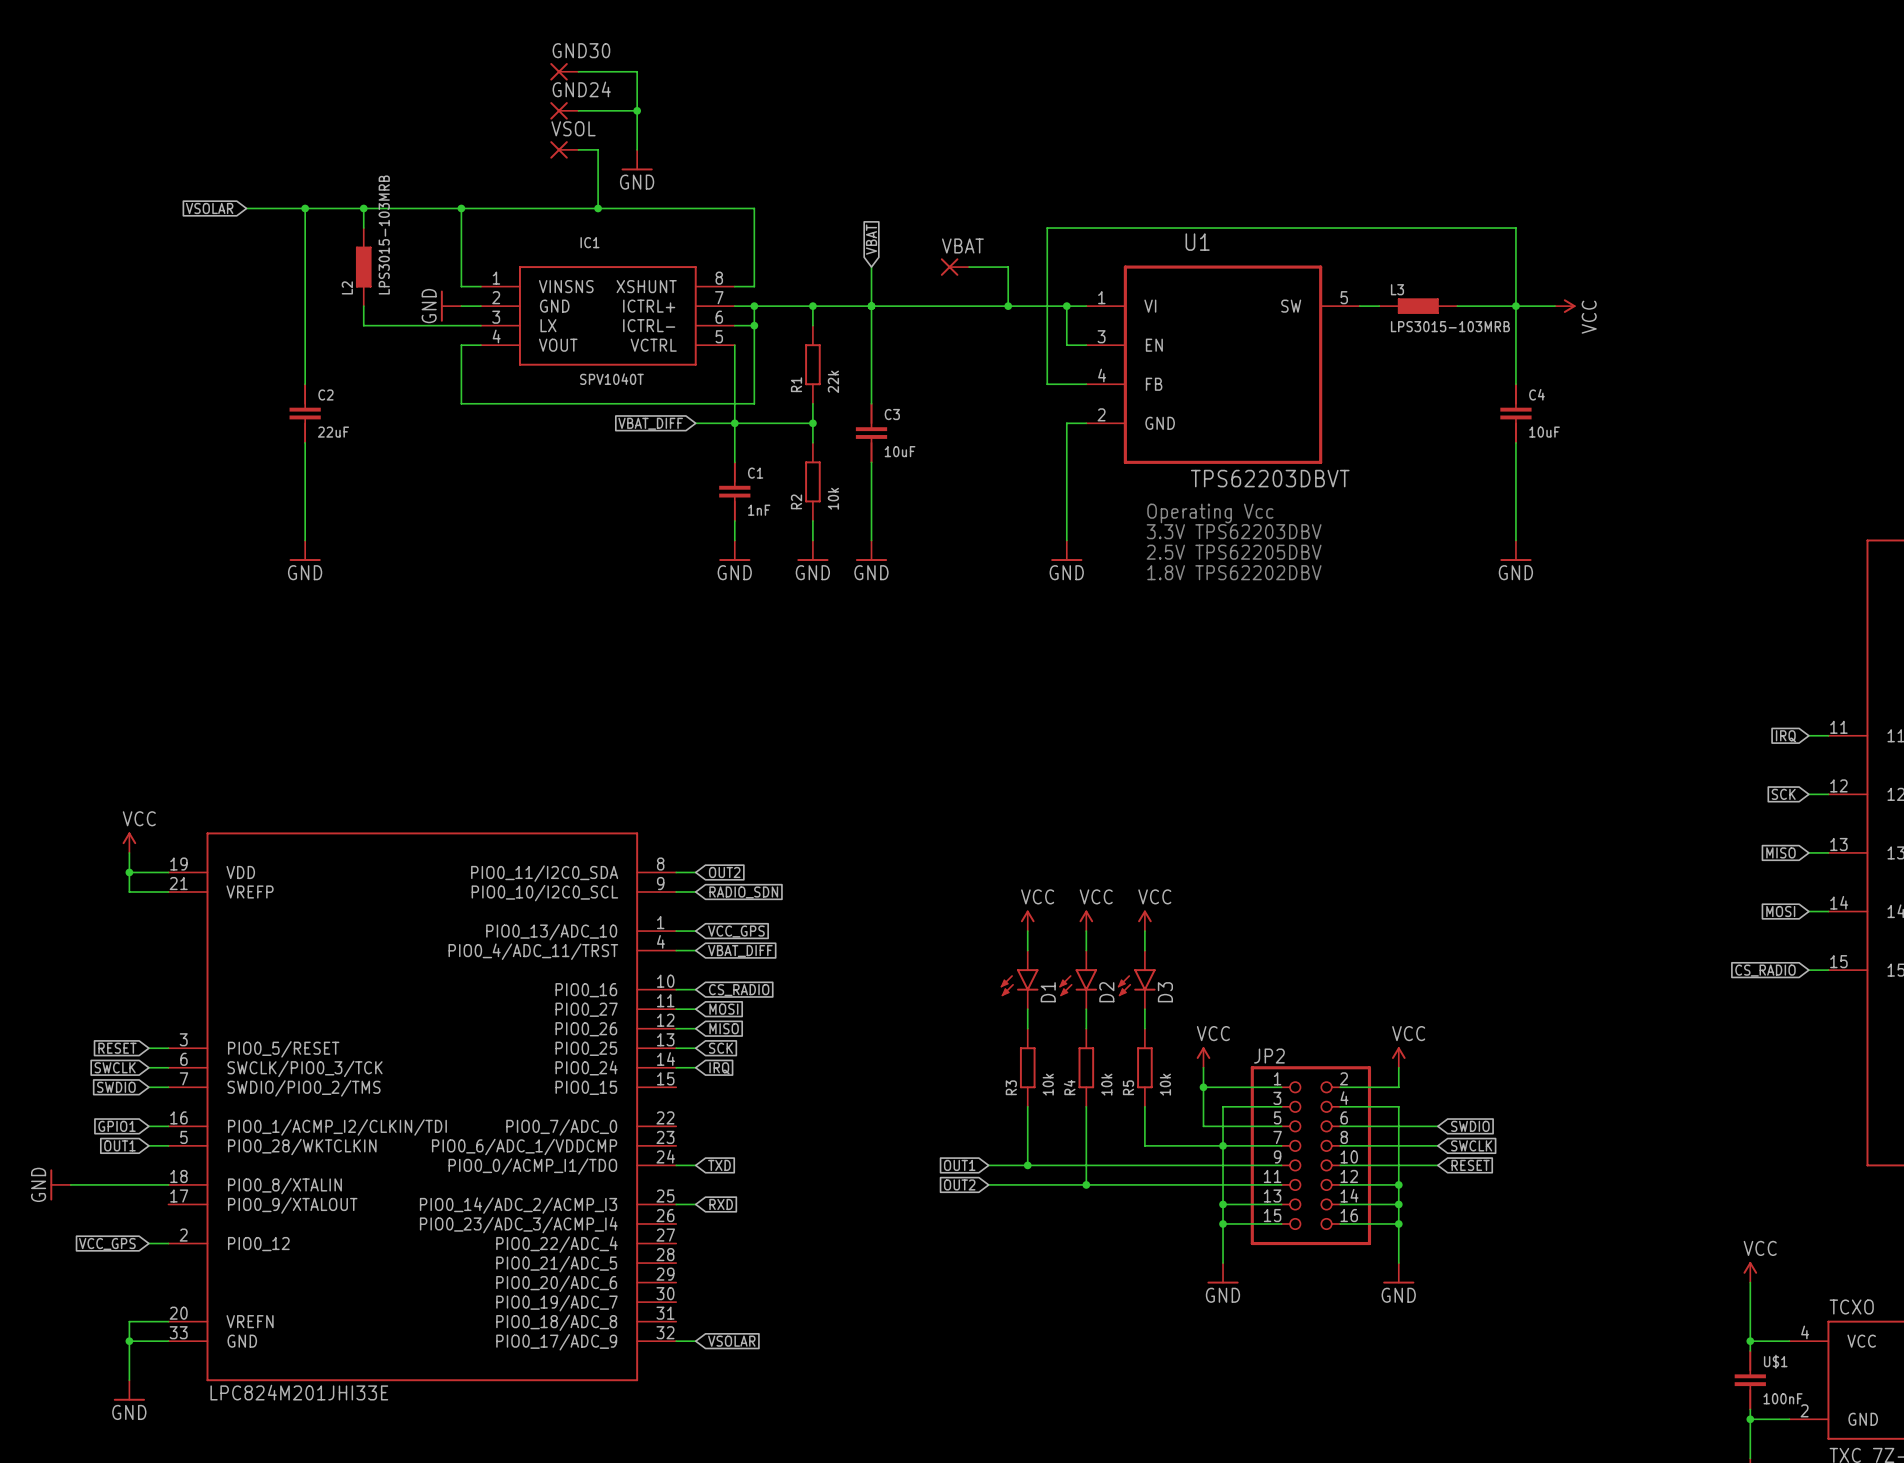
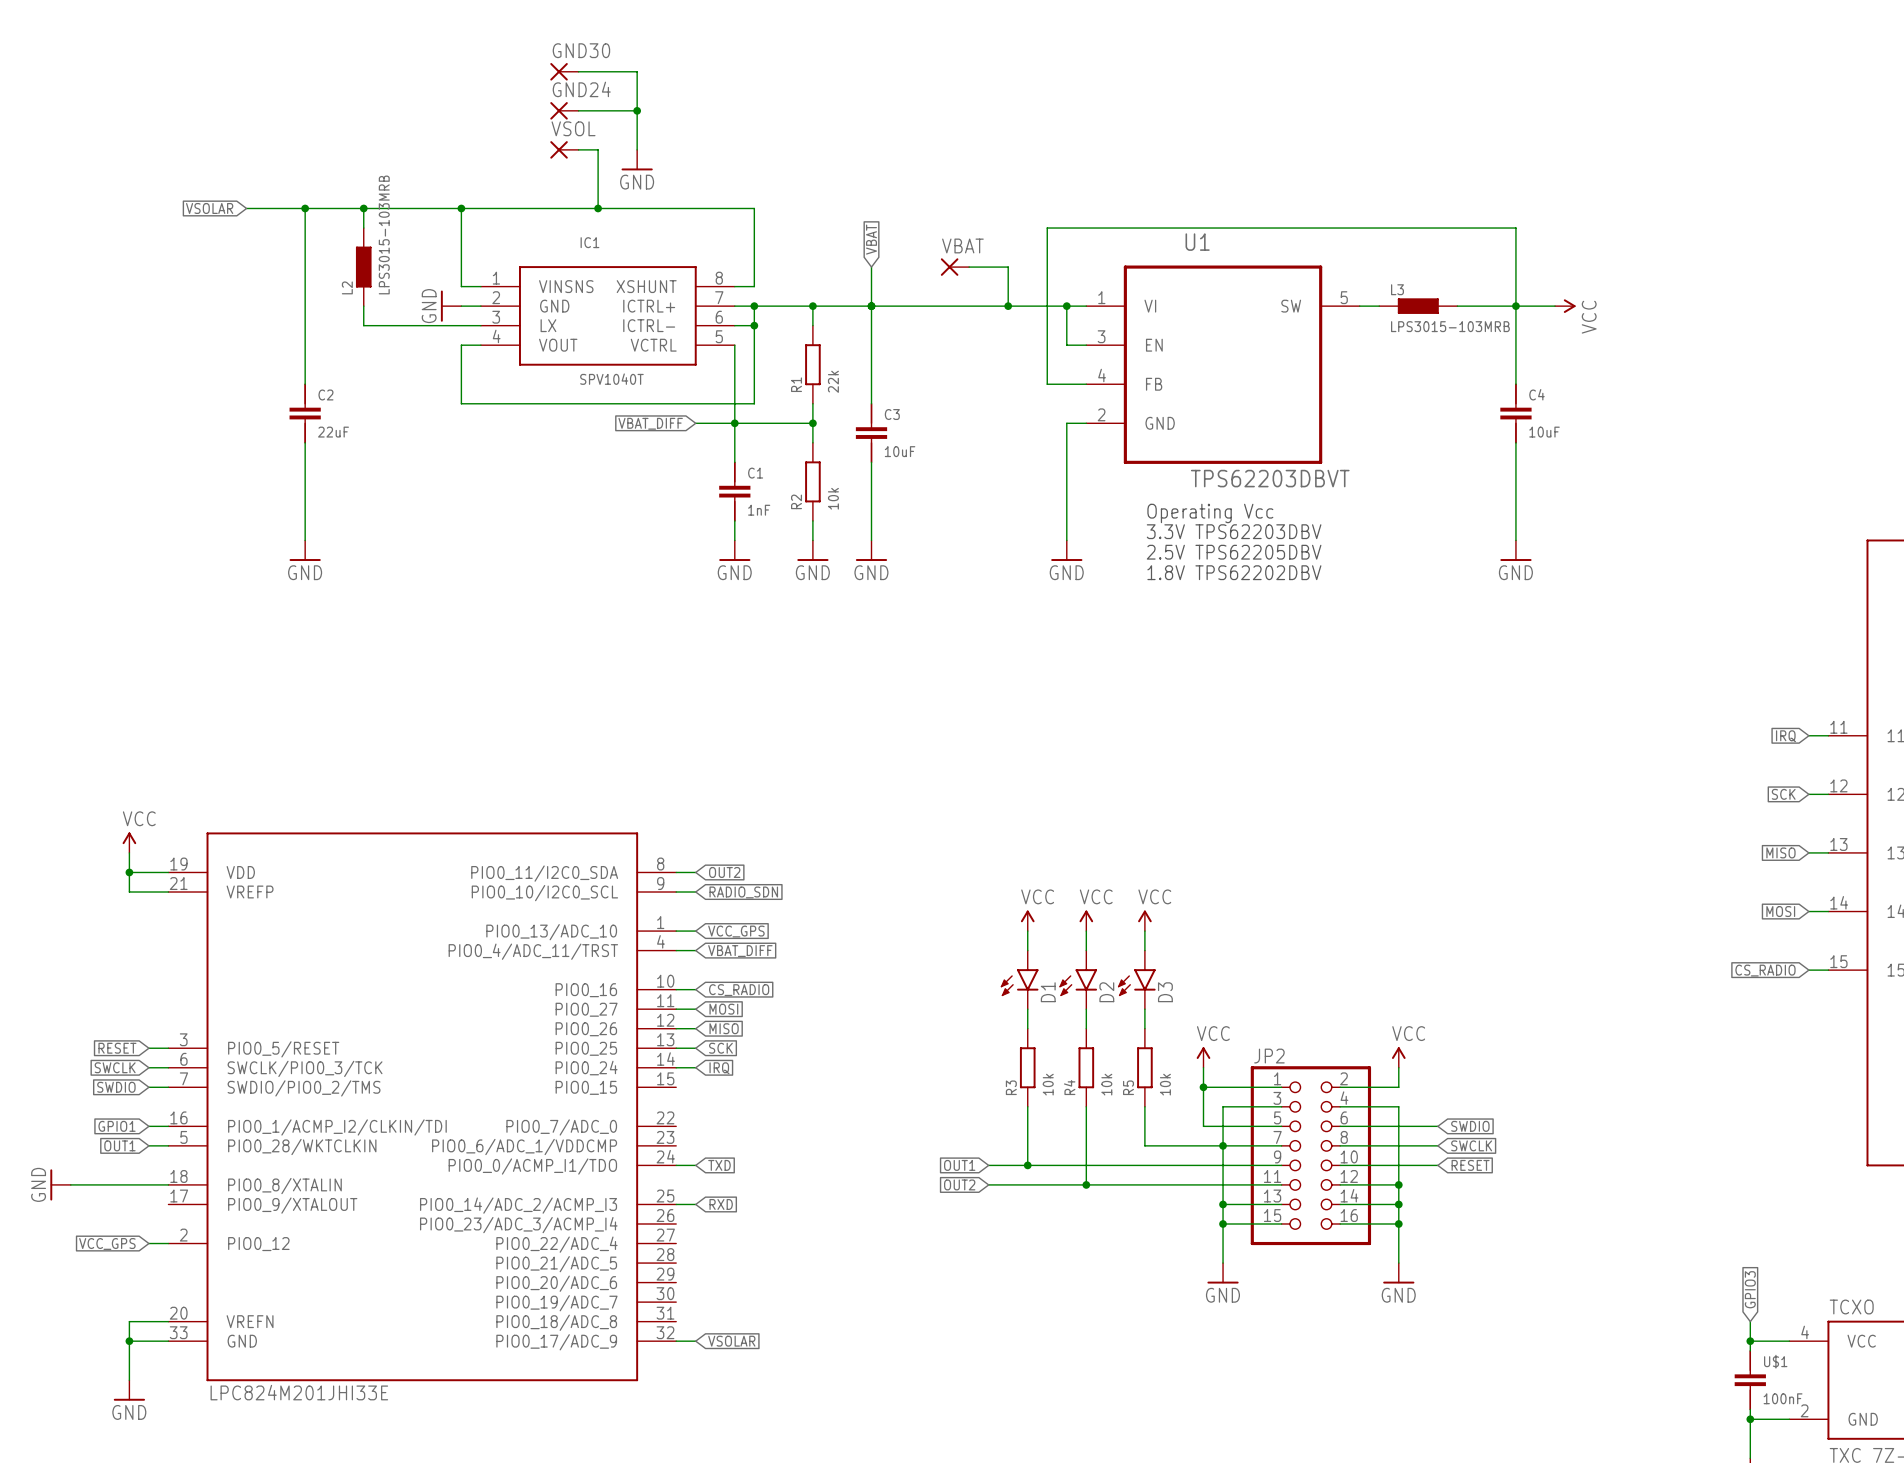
power symbol: VCC (1750, 1272) -> none
wire: (1750, 1282) (1750, 1321) -> none
global label: none -> GPIO3 (1750, 1289)

